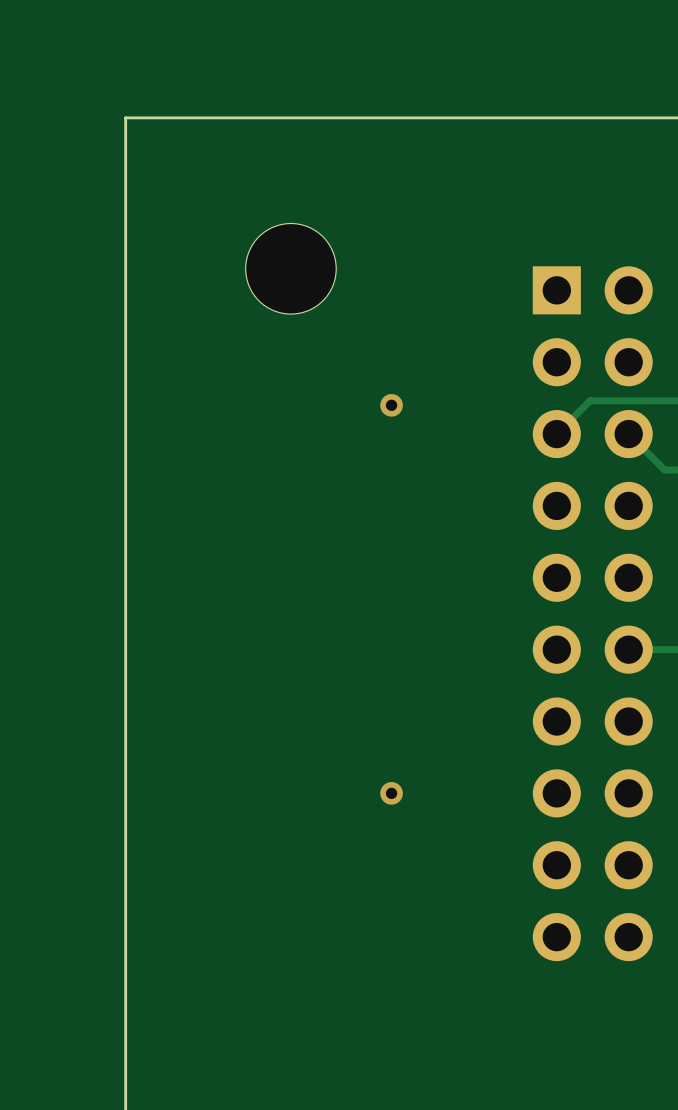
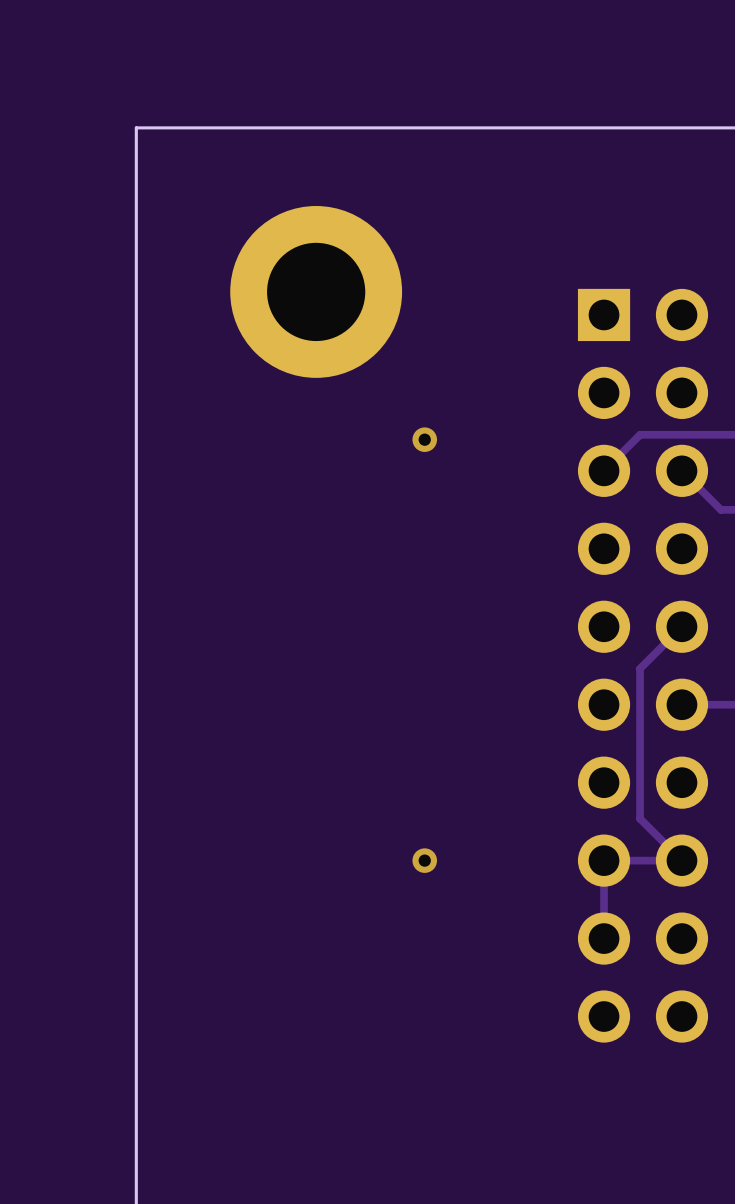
part footprint: [245, 223, 337, 315] -> [230, 206, 403, 378]
track: none -> (681, 626) (640, 668) (640, 818) (681, 860) (604, 860) (604, 938)

